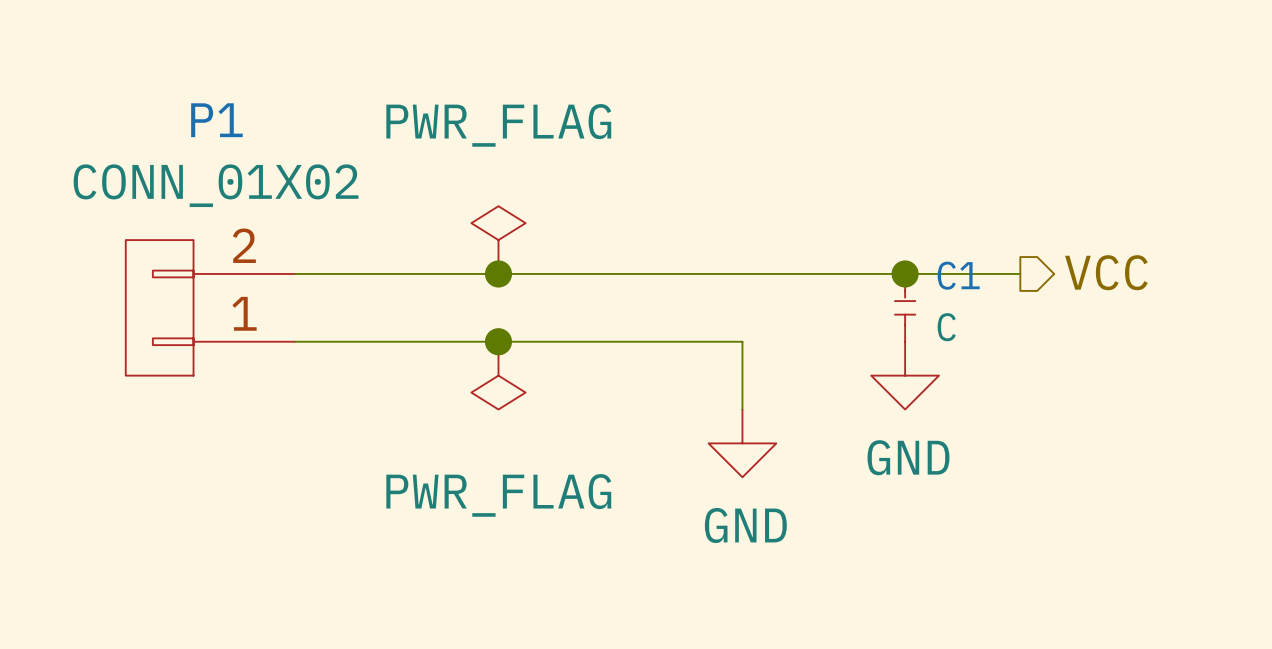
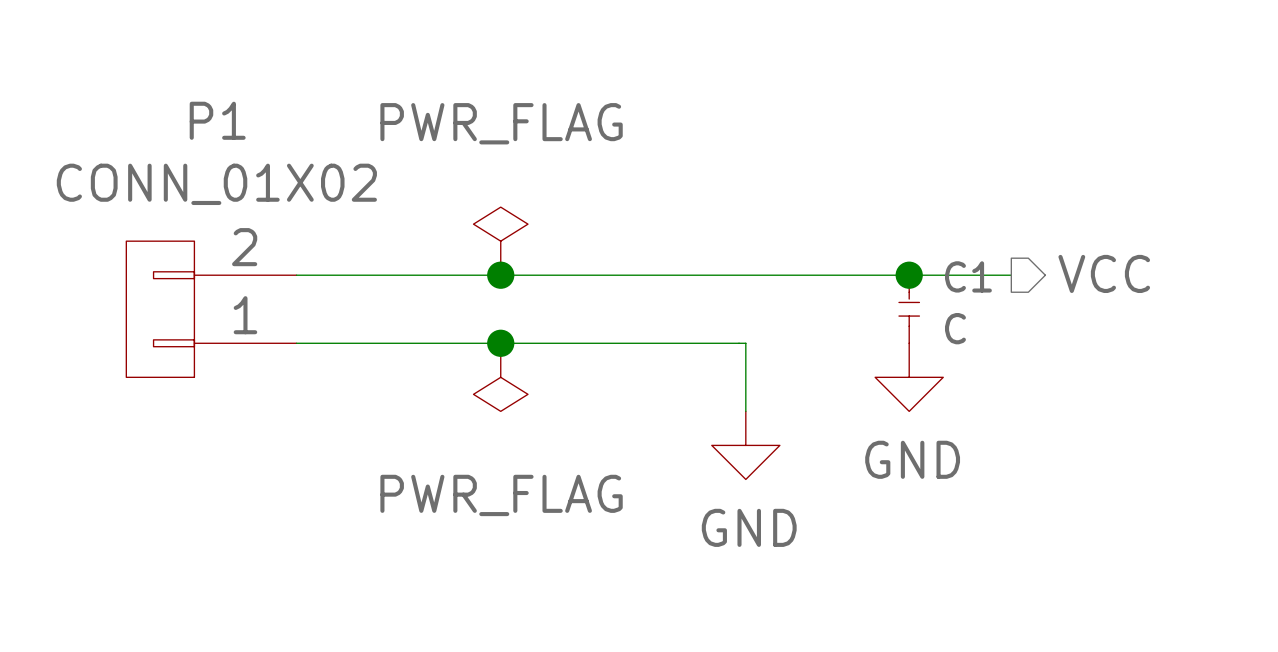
hierarchical label position: VCC (1106, 272) -> VCC (1104, 273)
wire: (1006, 273) (1020, 273) -> none

